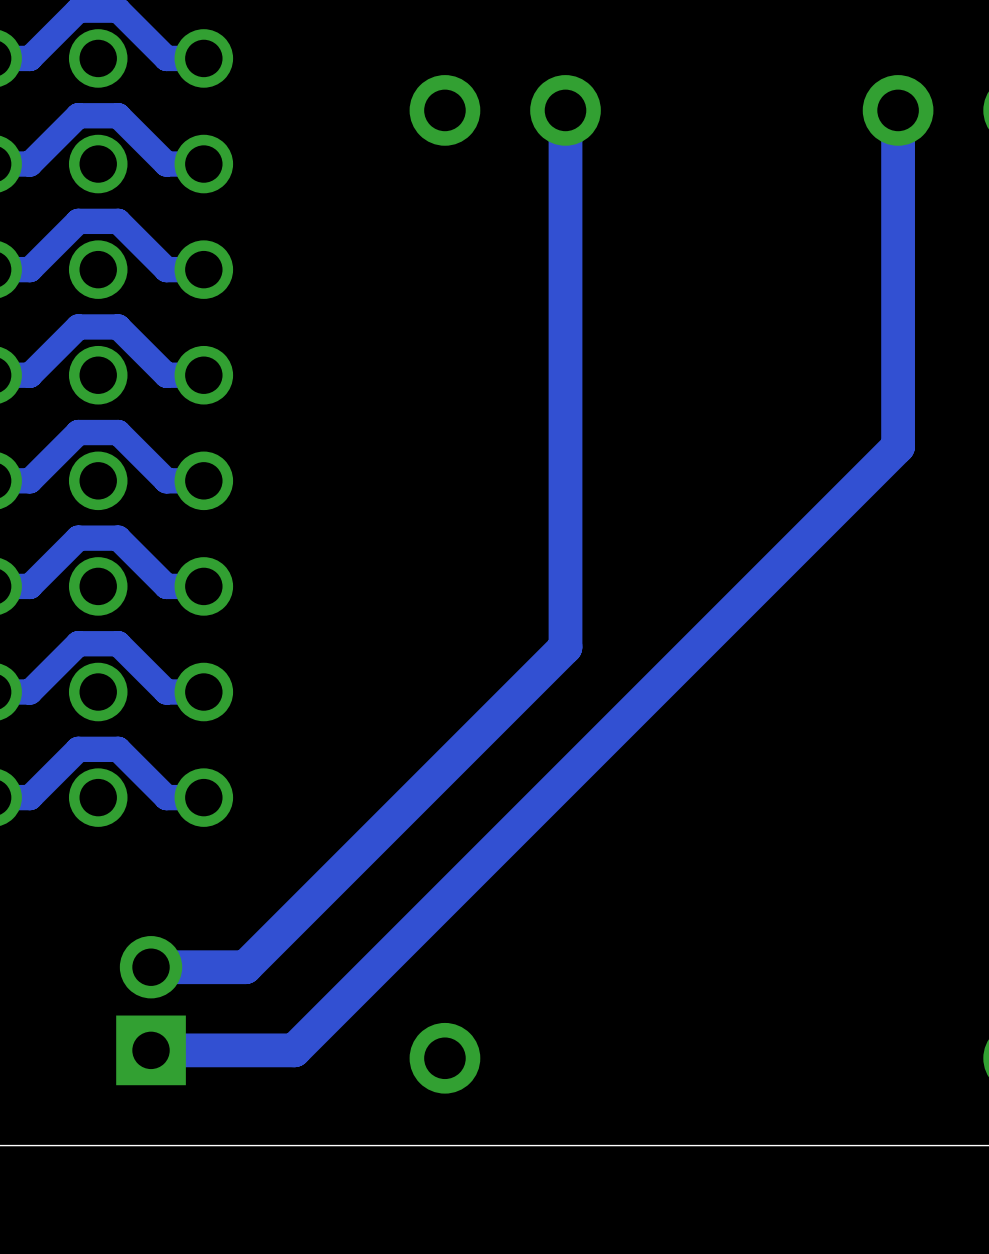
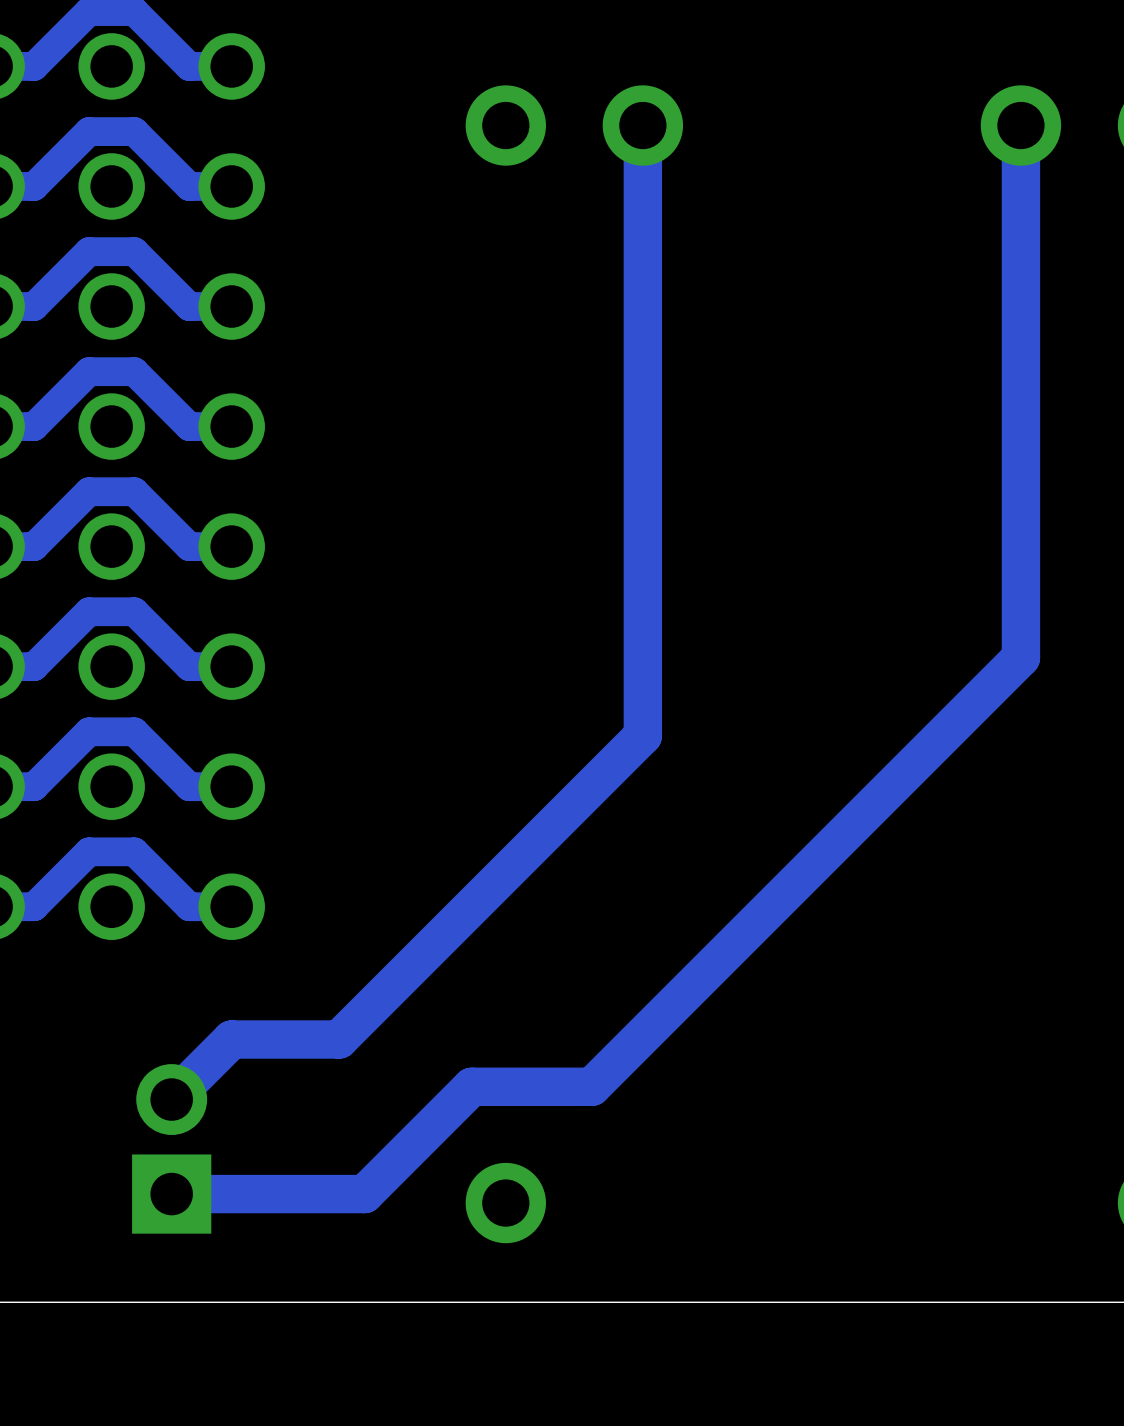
track: (898, 446) (294, 1050) -> (1020, 507) (1020, 657) (591, 1086) (471, 1086) (364, 1194) (334, 1194)
track: (298, 914) (245, 967) (151, 967) -> (338, 1039) (231, 1039) (171, 1099)

